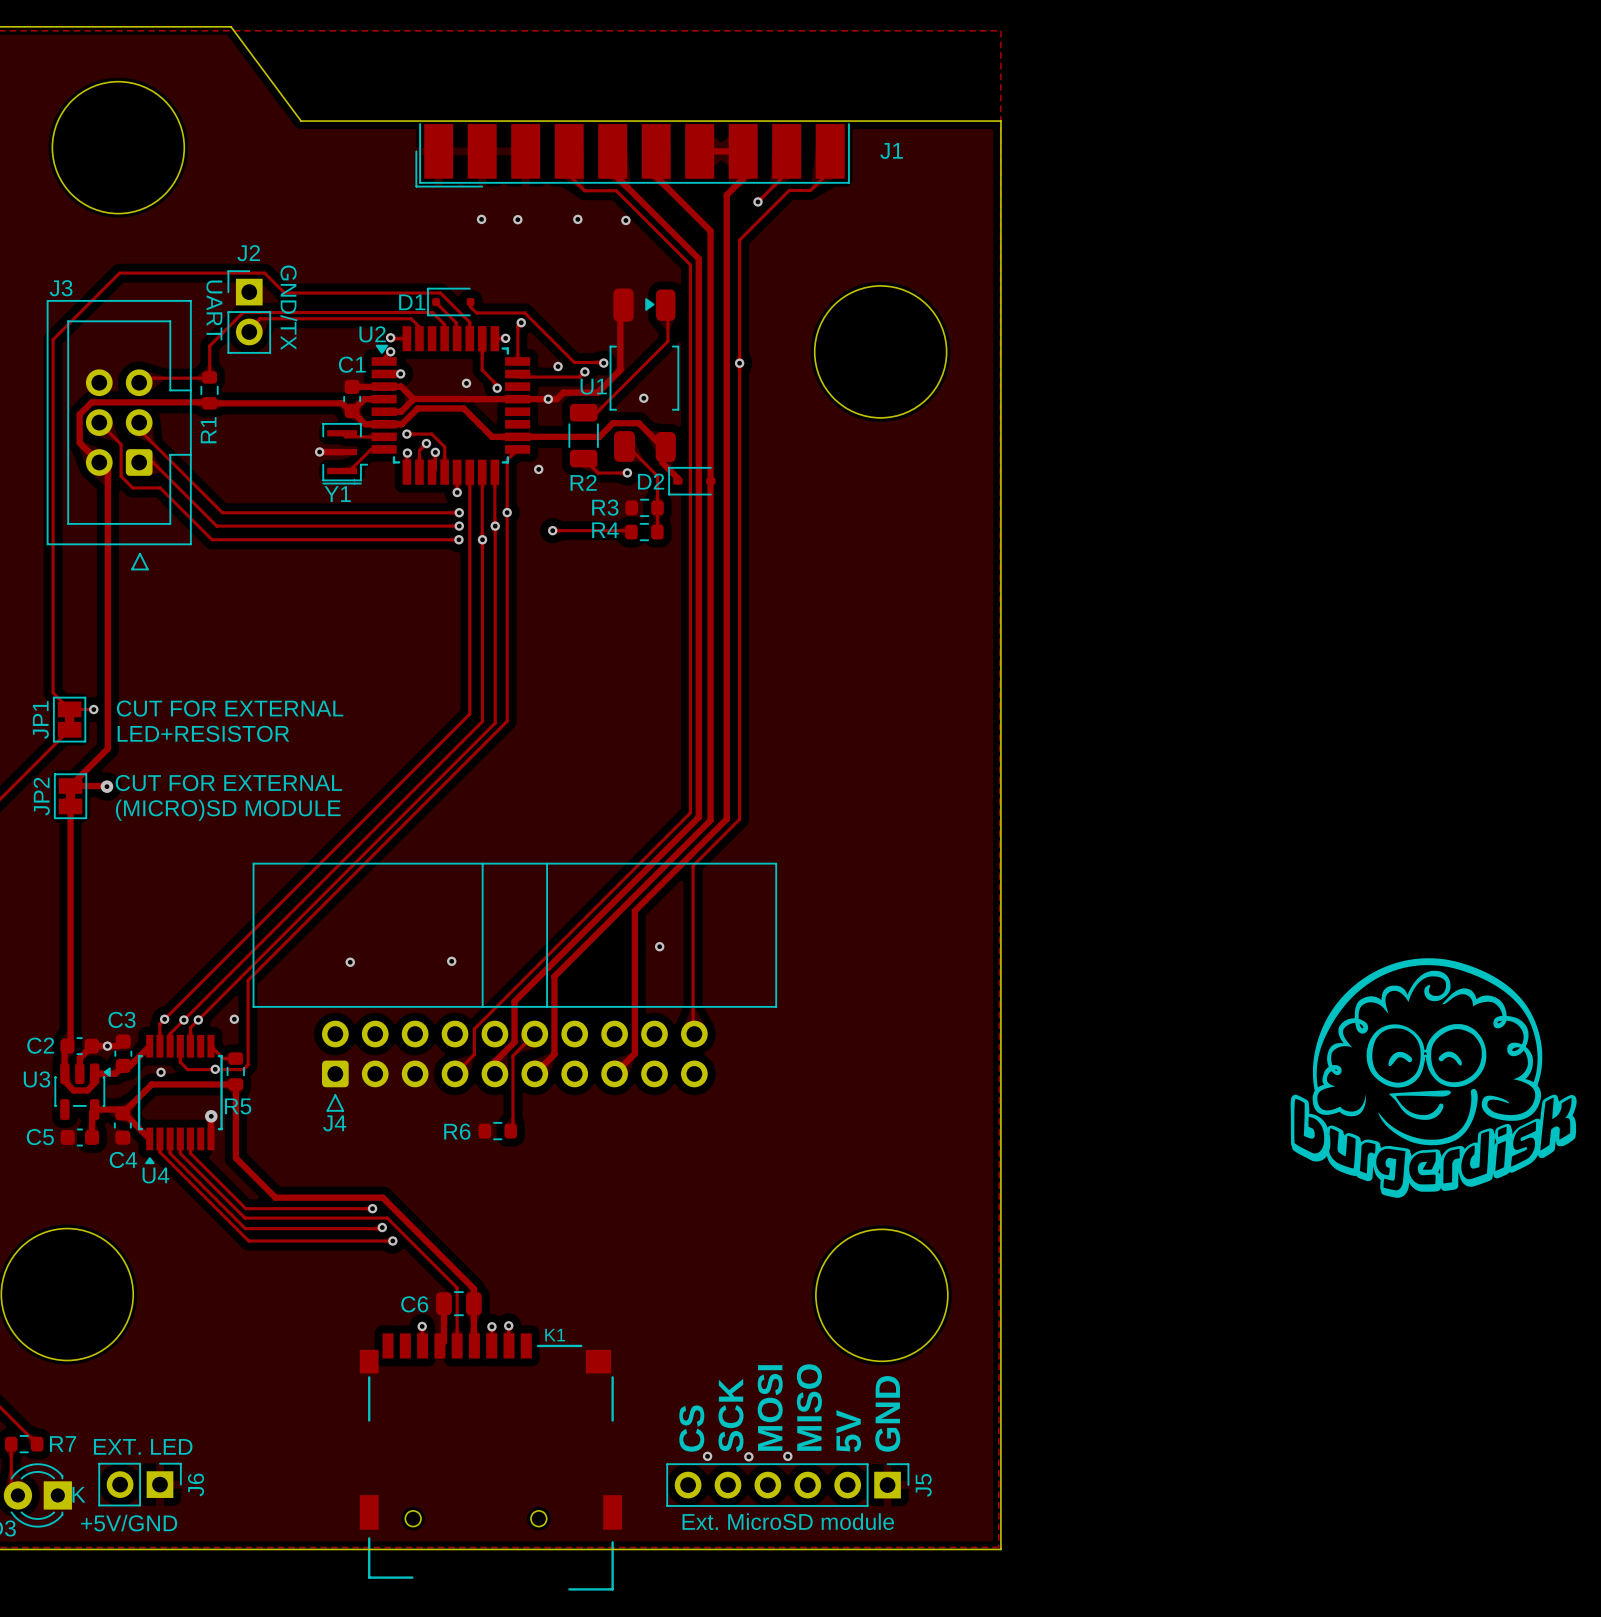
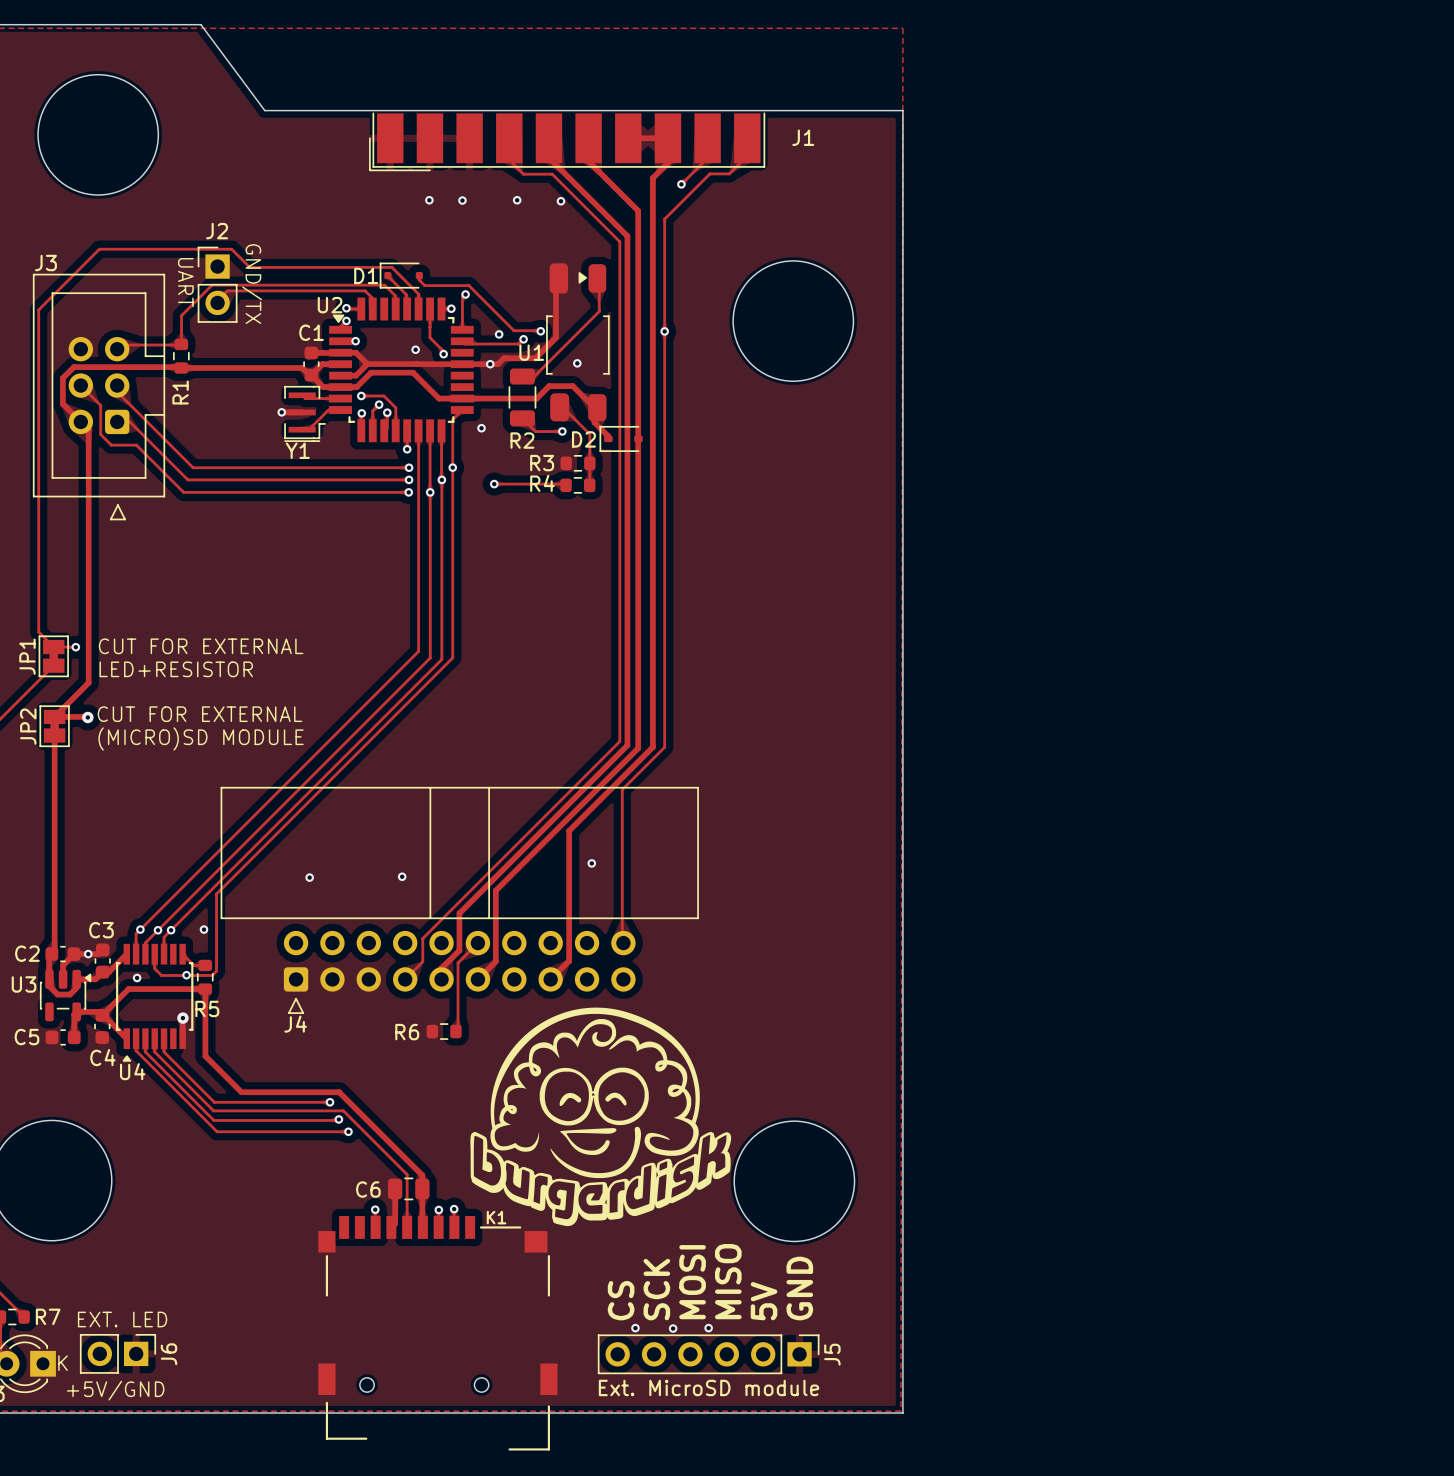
drawing: [1290, 958, 1577, 1198] -> none
drawing: none -> [470, 1007, 732, 1227]

